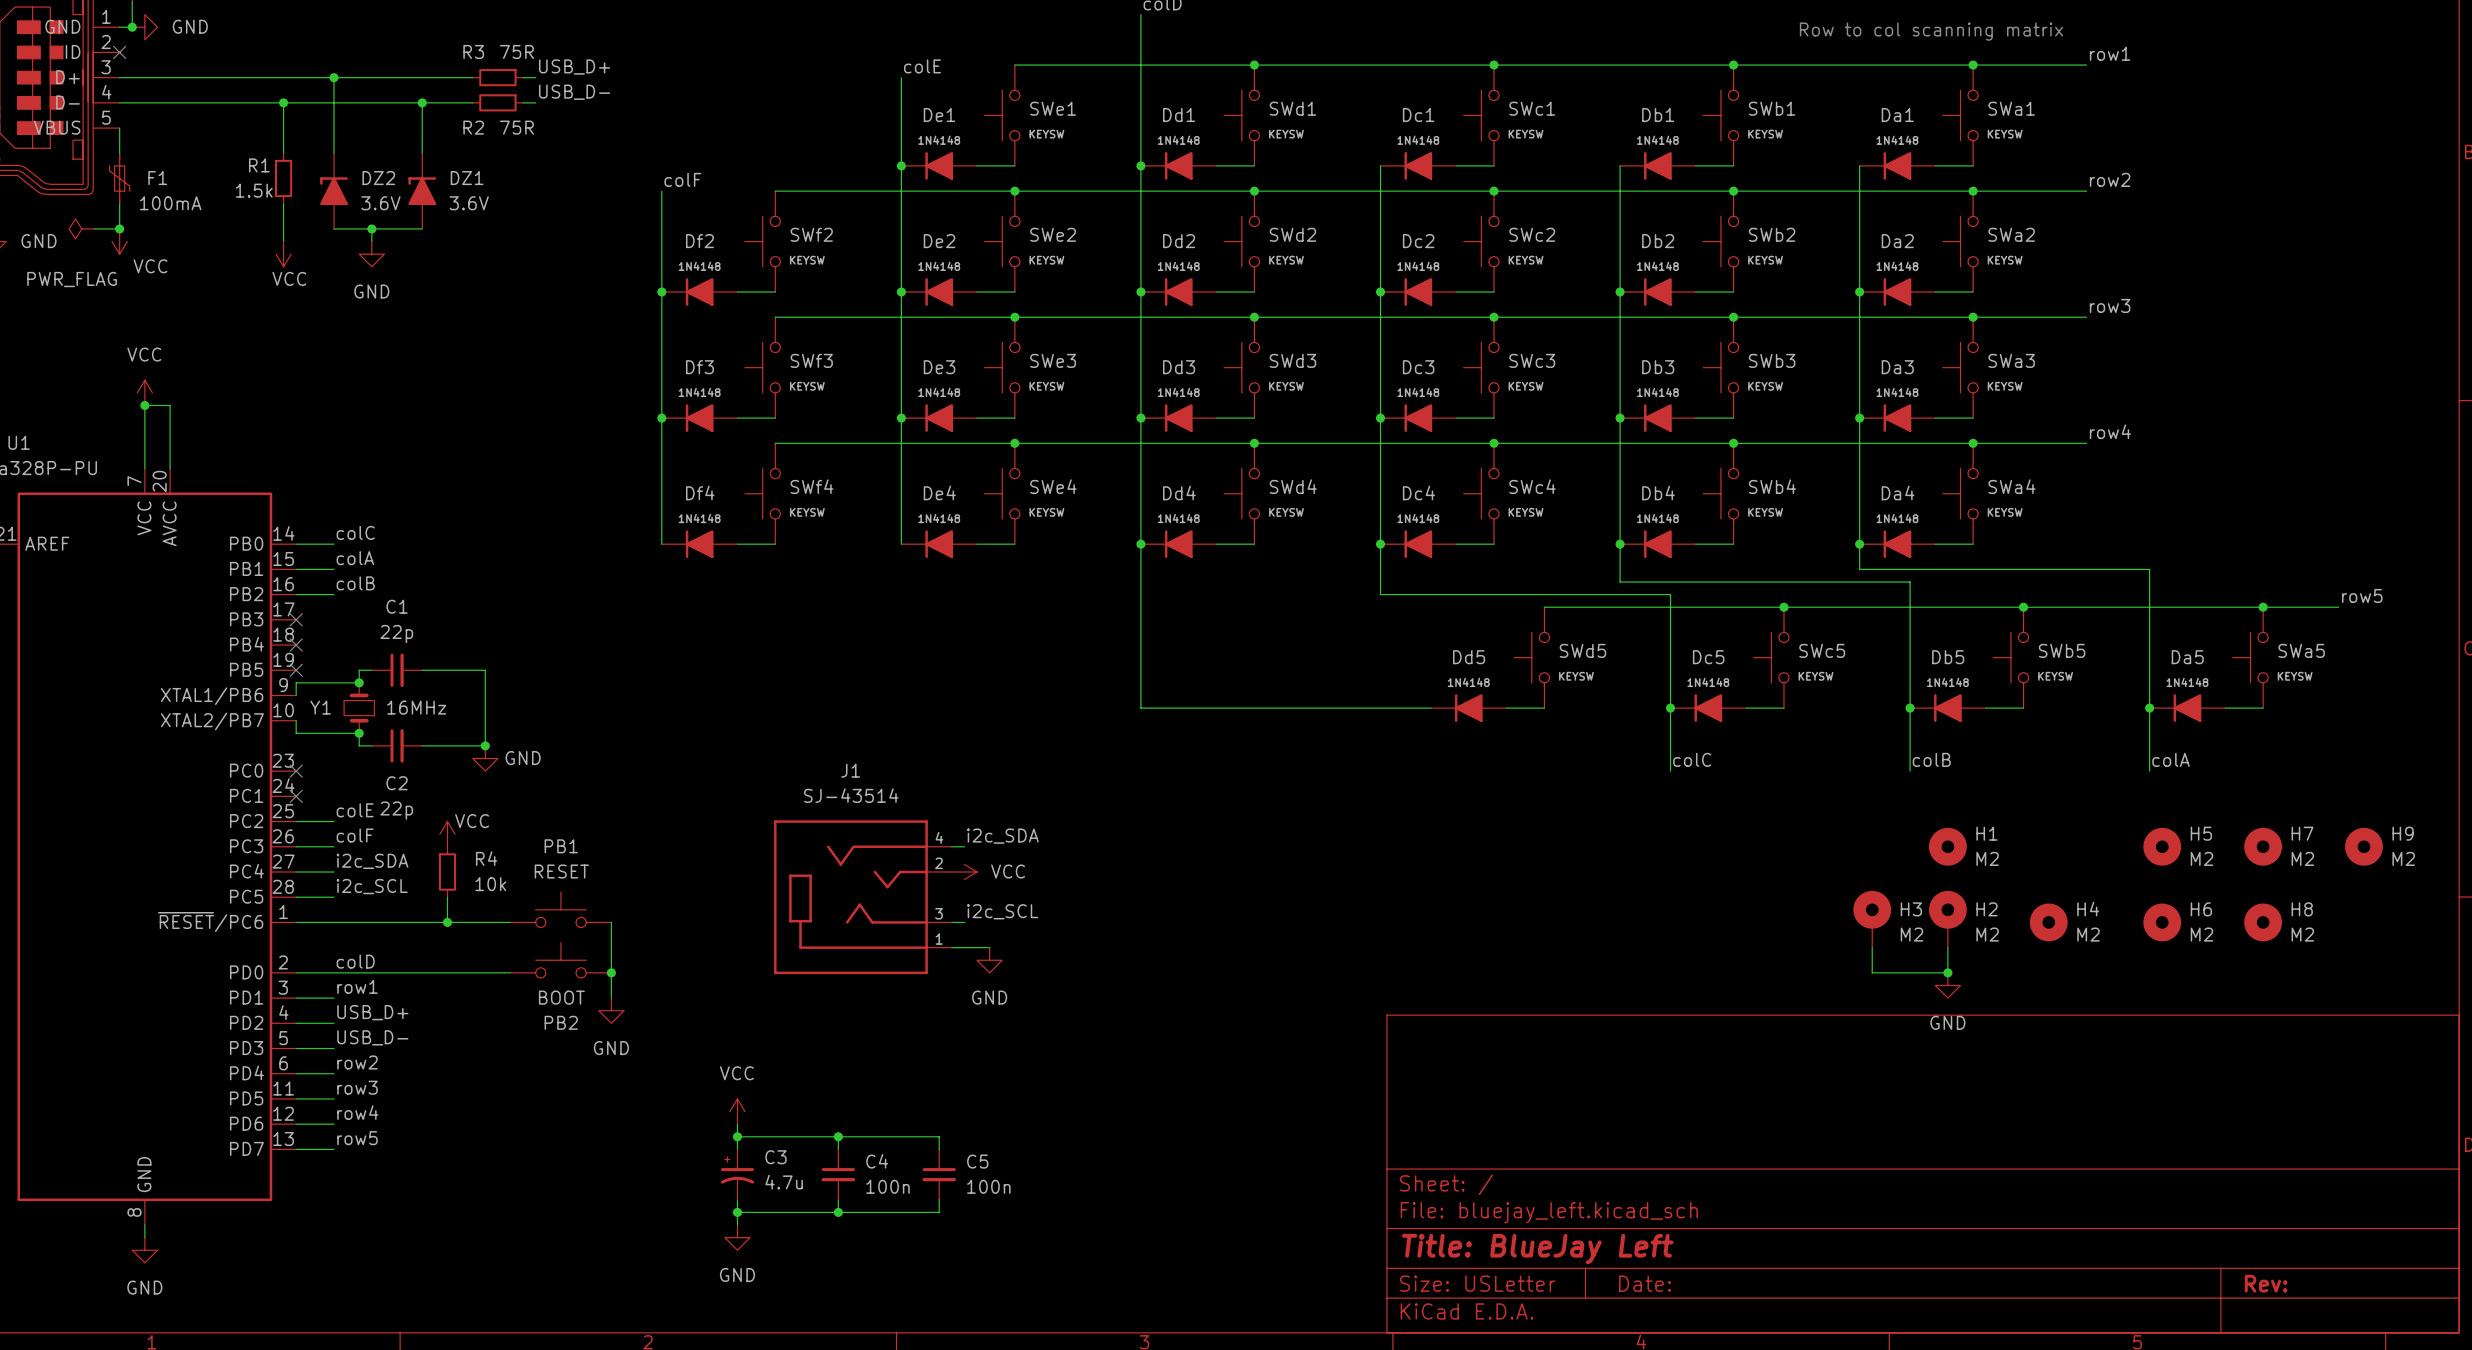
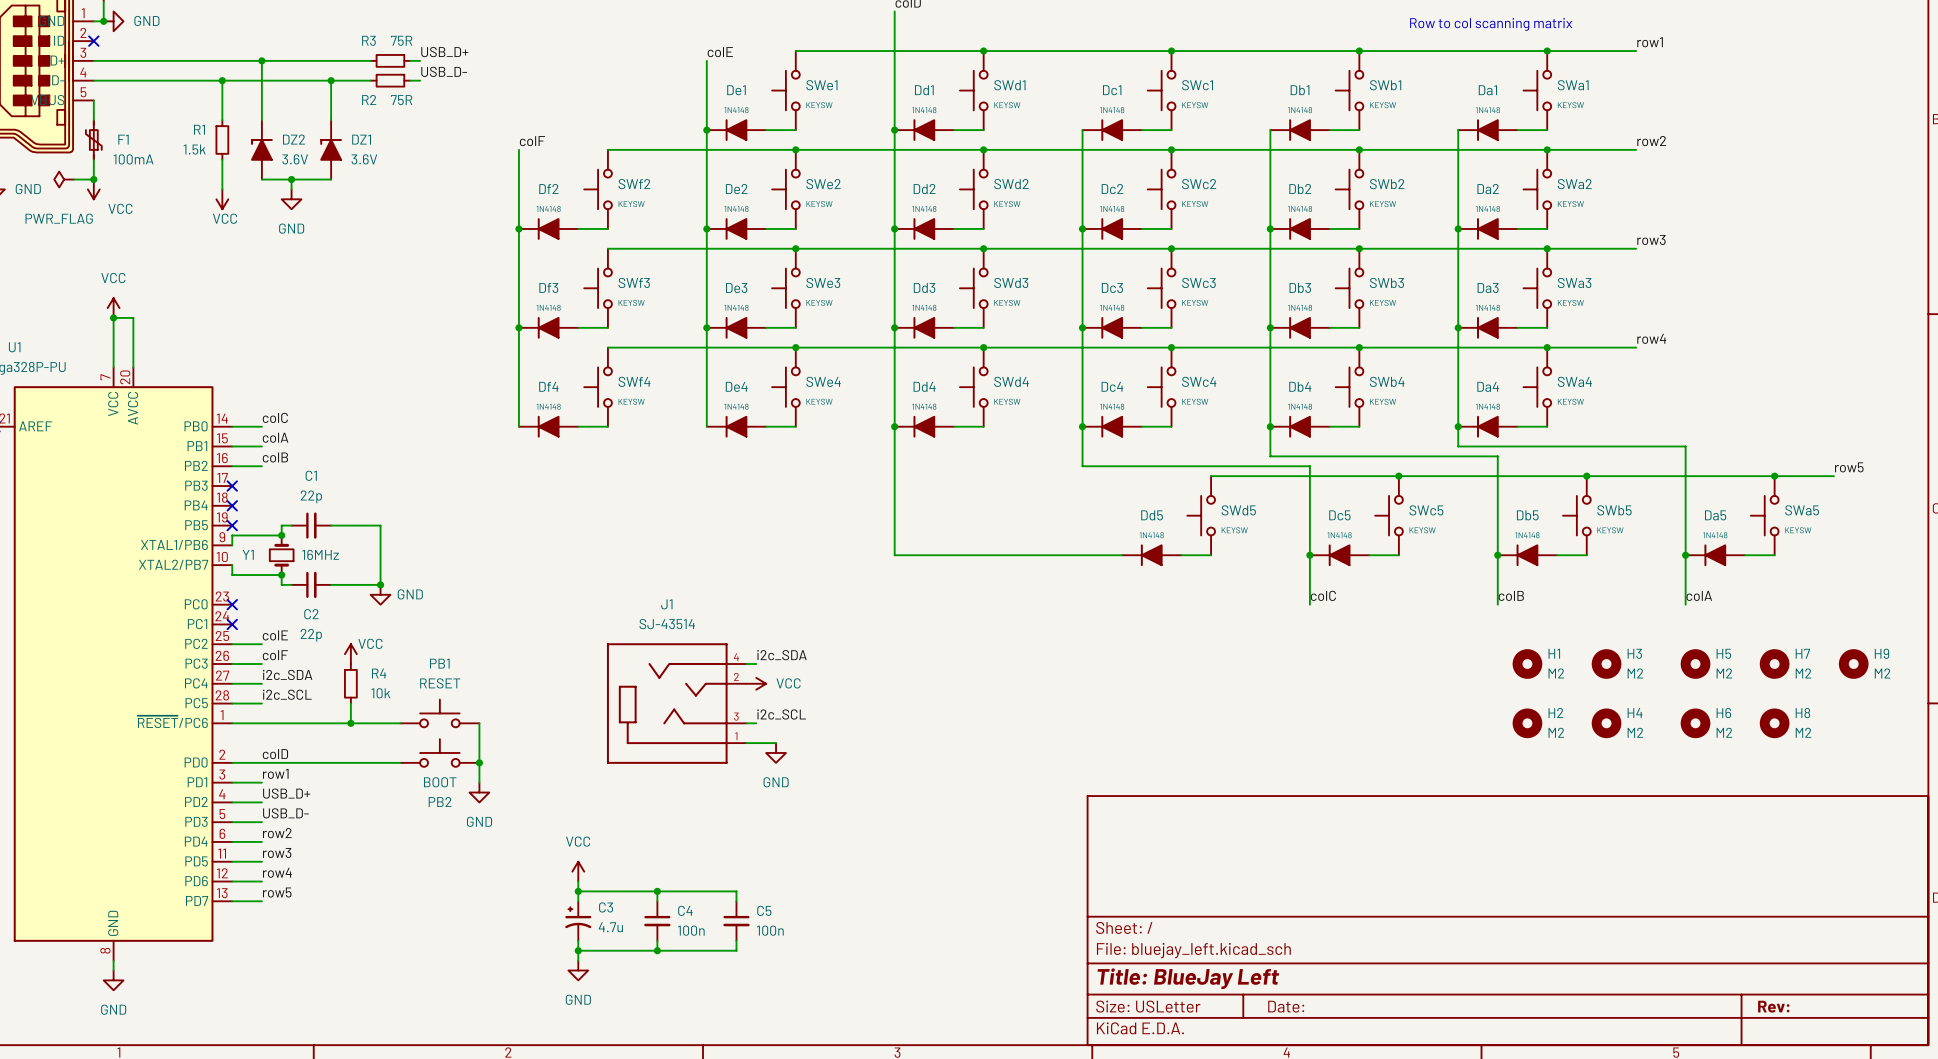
H3 symbol: [1853, 890, 1892, 948] -> [1591, 649, 1622, 679]
H2 symbol: [1928, 890, 1967, 948] -> [1512, 708, 1543, 739]
wire: (1872, 947) (1872, 972) (1947, 972) (1947, 947) -> none
junction: (1947, 972) -> none
power symbol: GND (1947, 985) -> none

